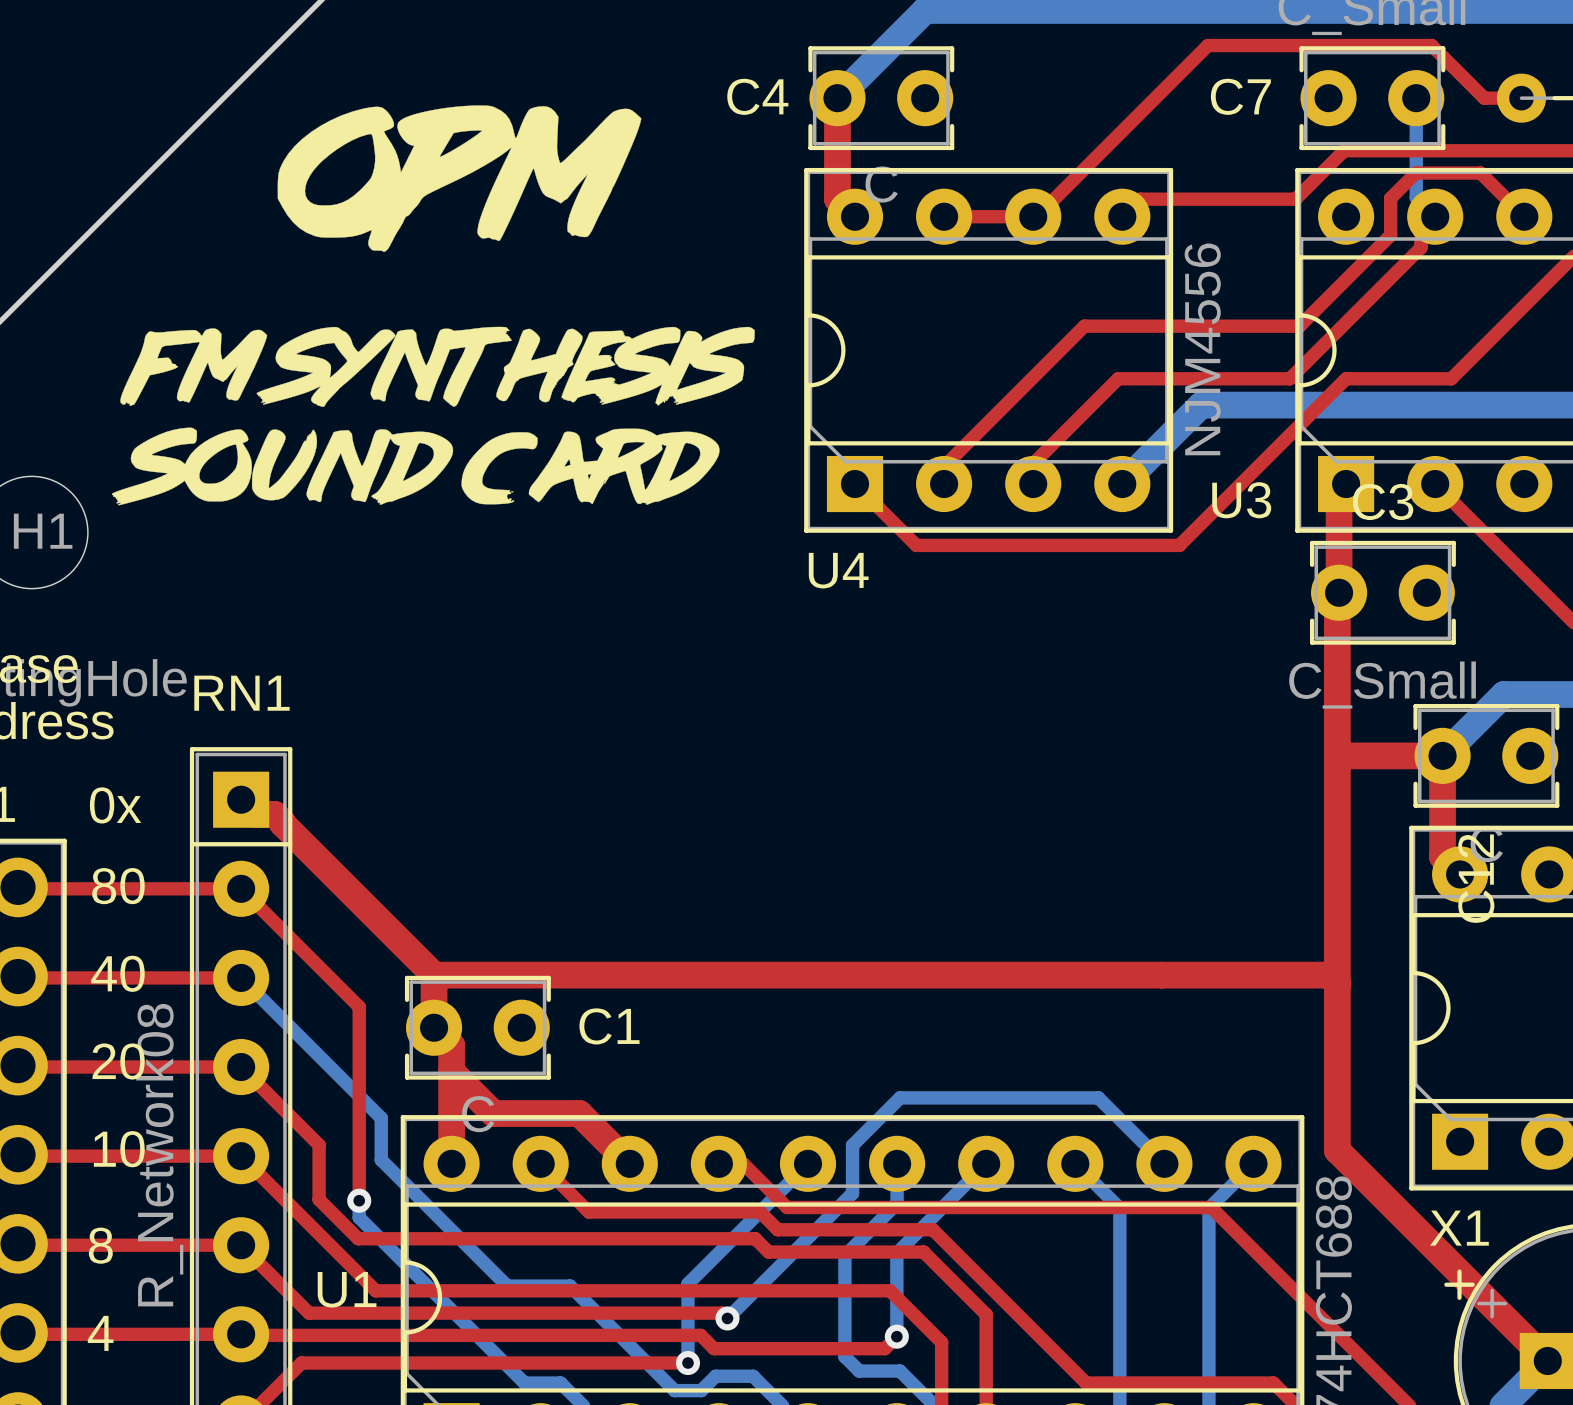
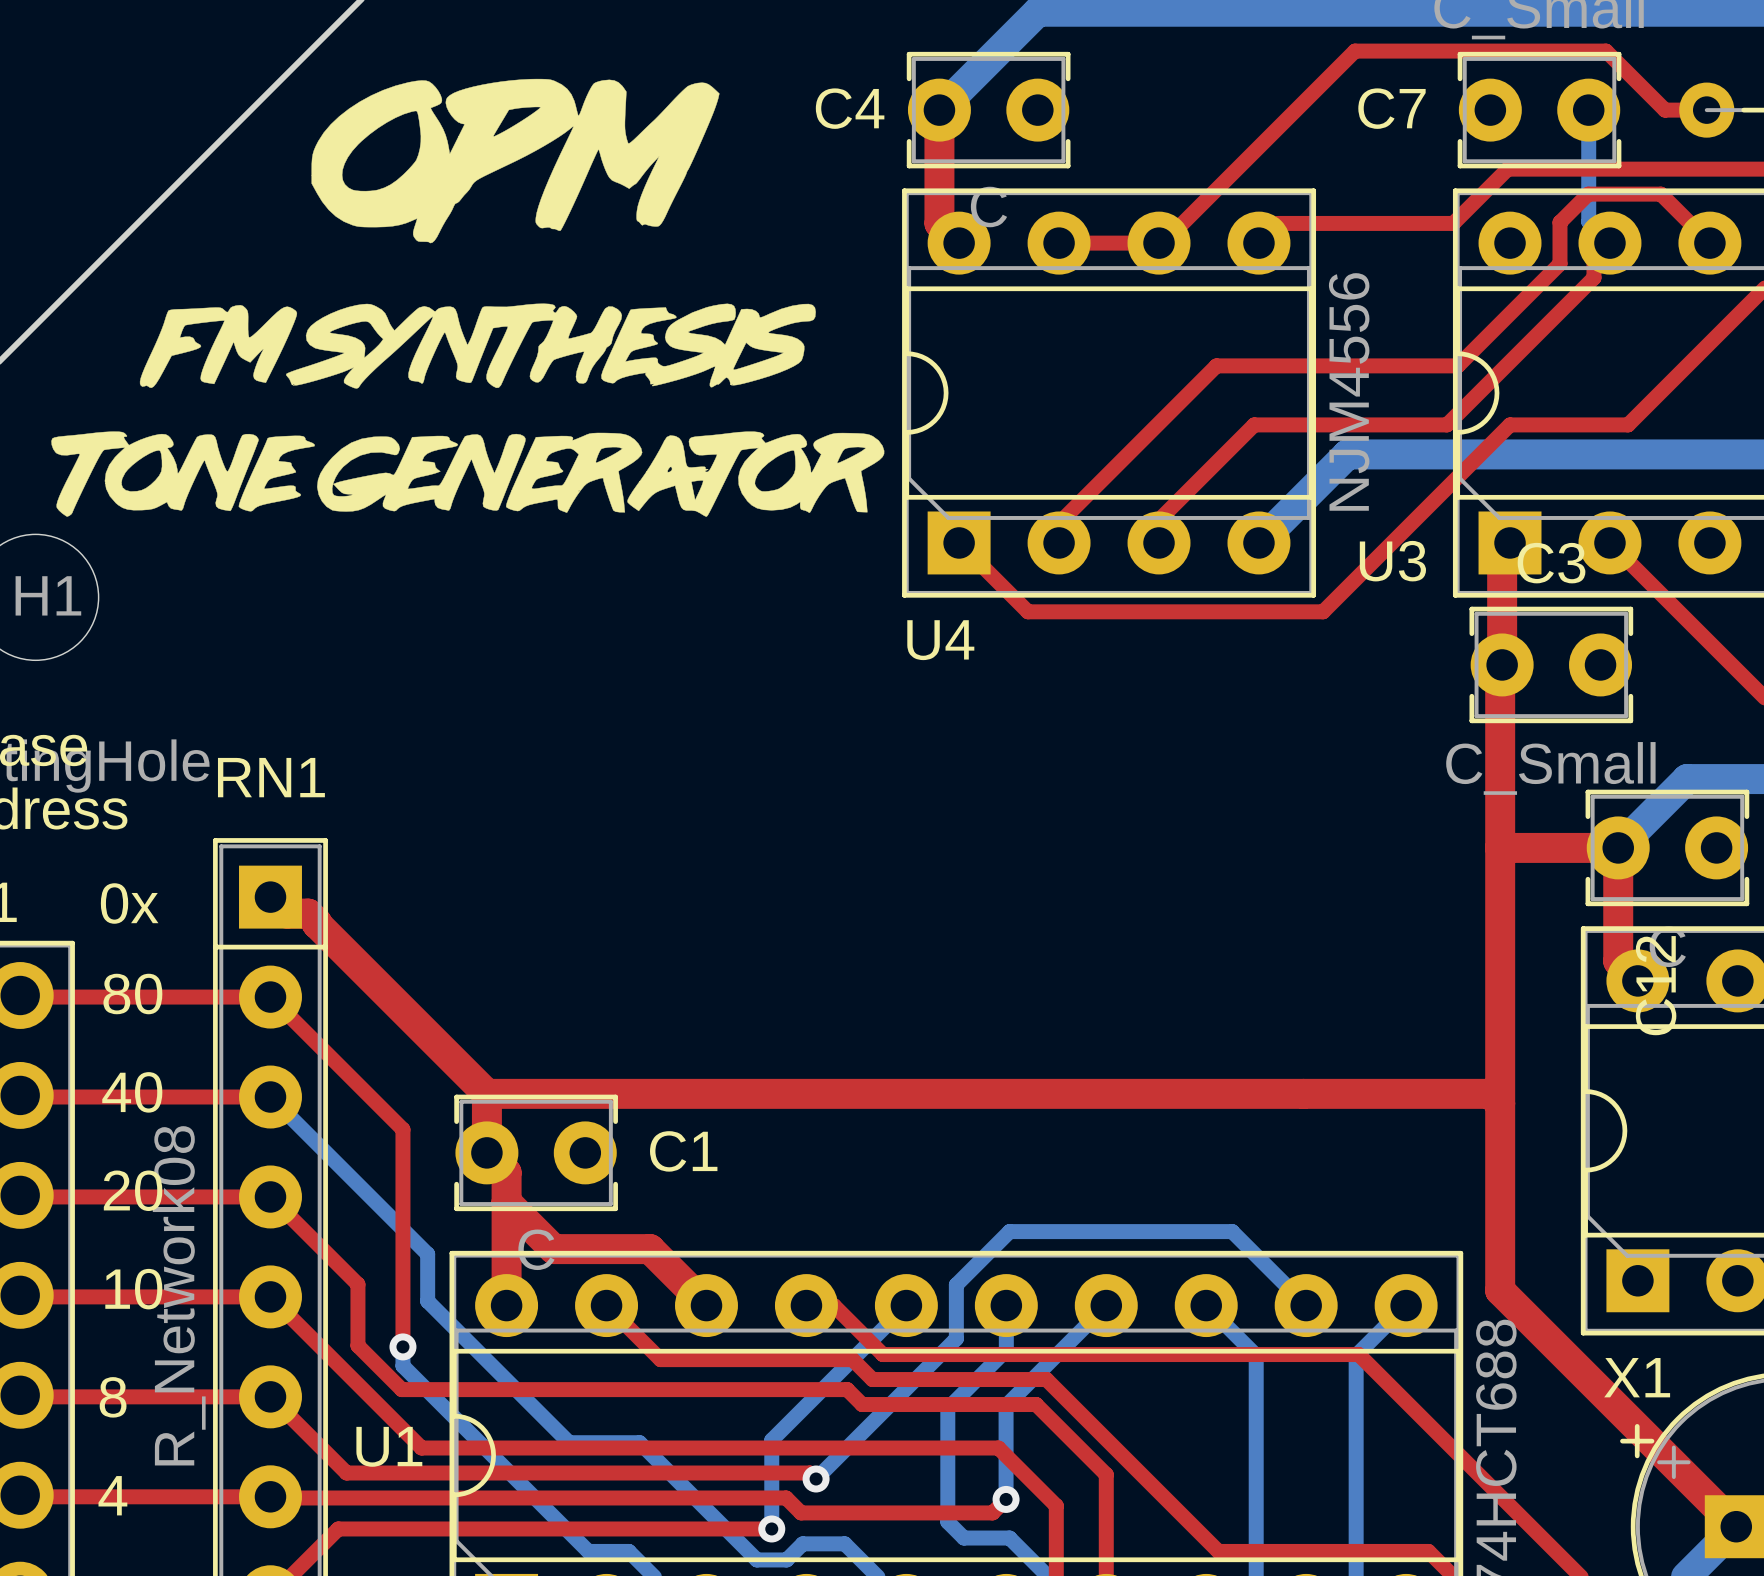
drawing position: (459, 178) -> (515, 161)
drawing: none -> [139, 303, 816, 389]
drawing shape: [111, 326, 755, 506] -> [51, 431, 885, 517]

